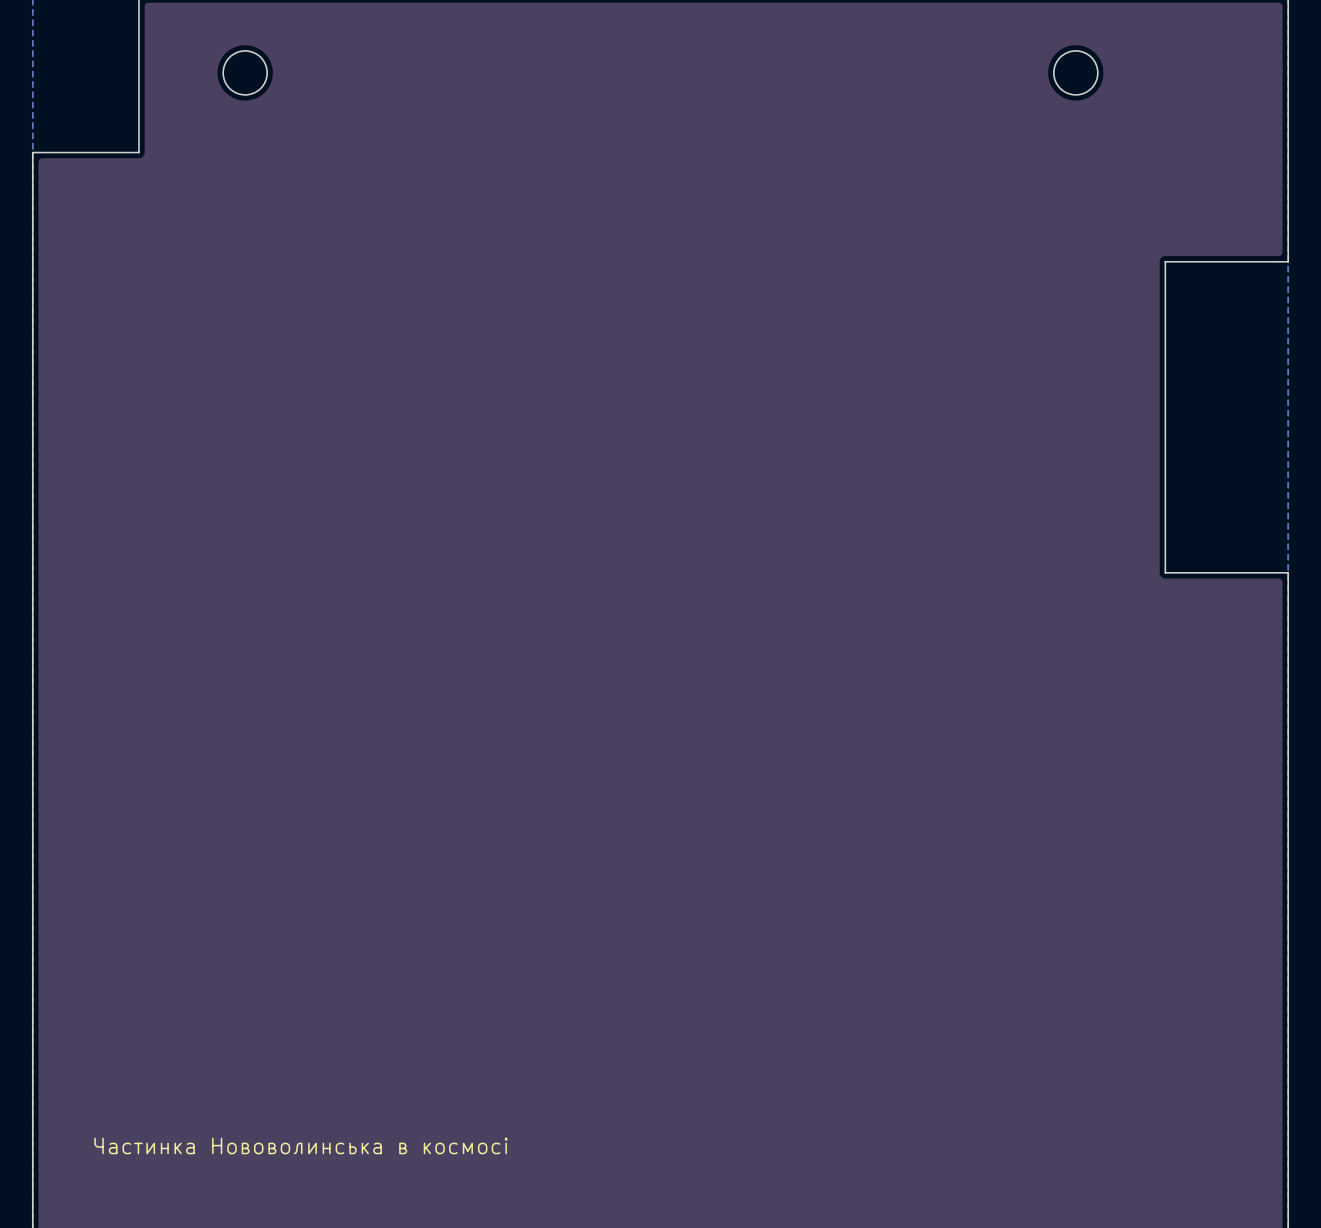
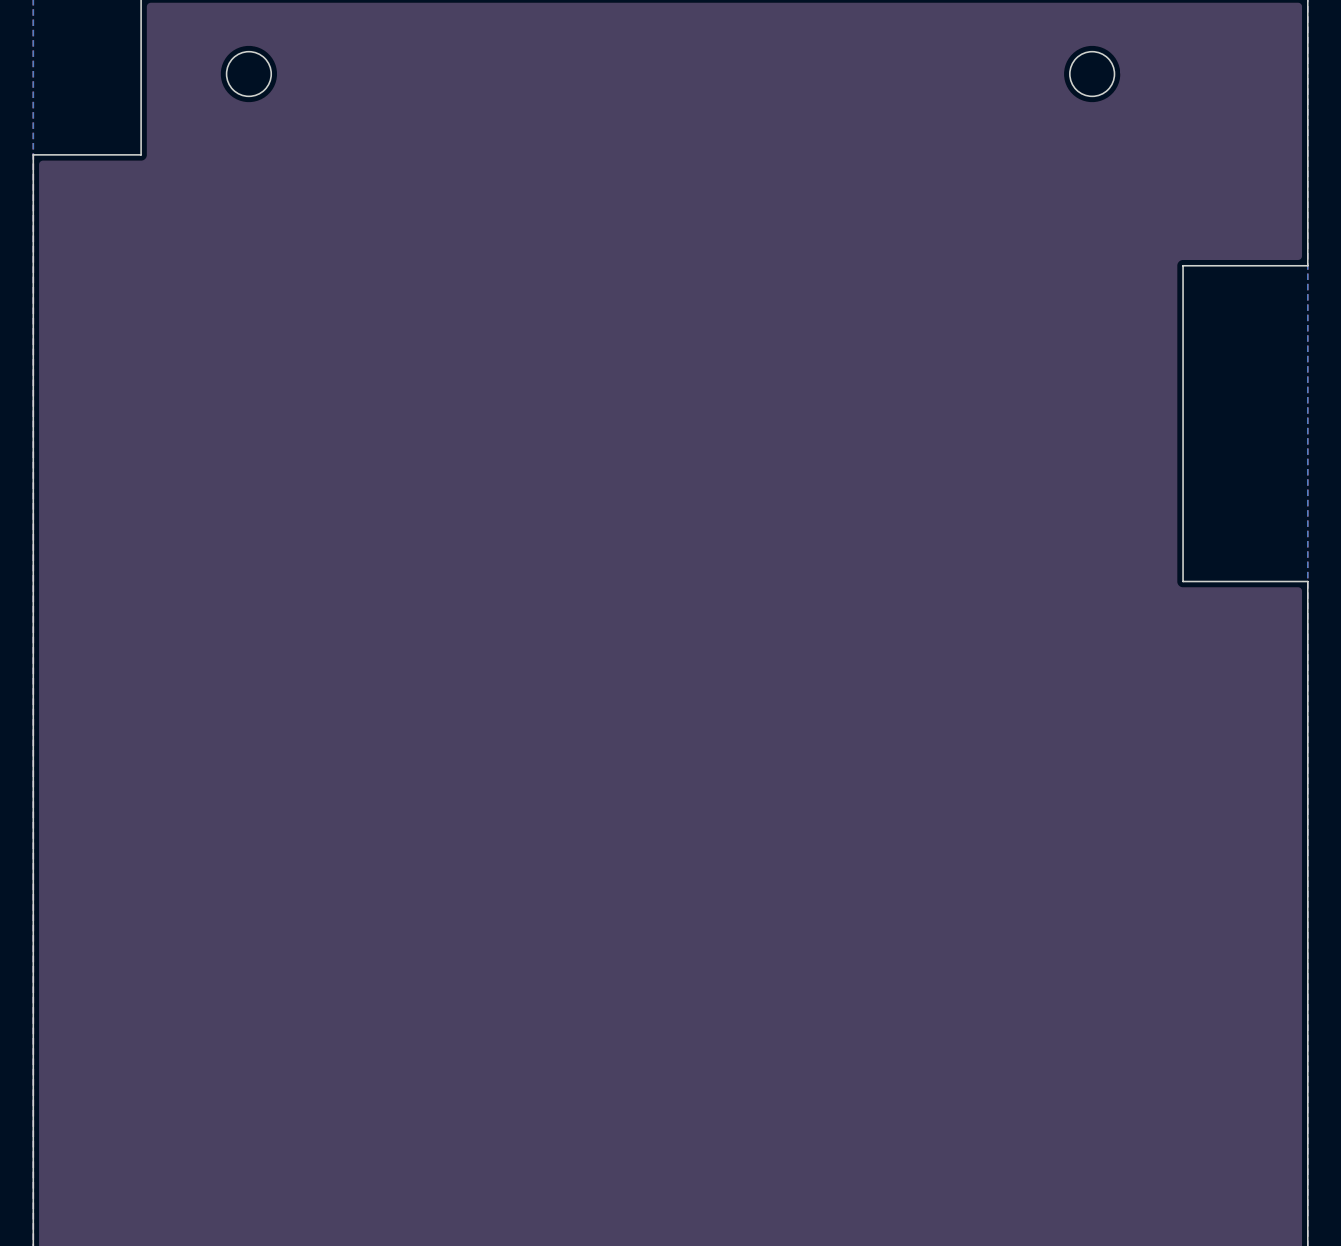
text: Частинка Нововолинська в космосі (300, 1145) -> none

